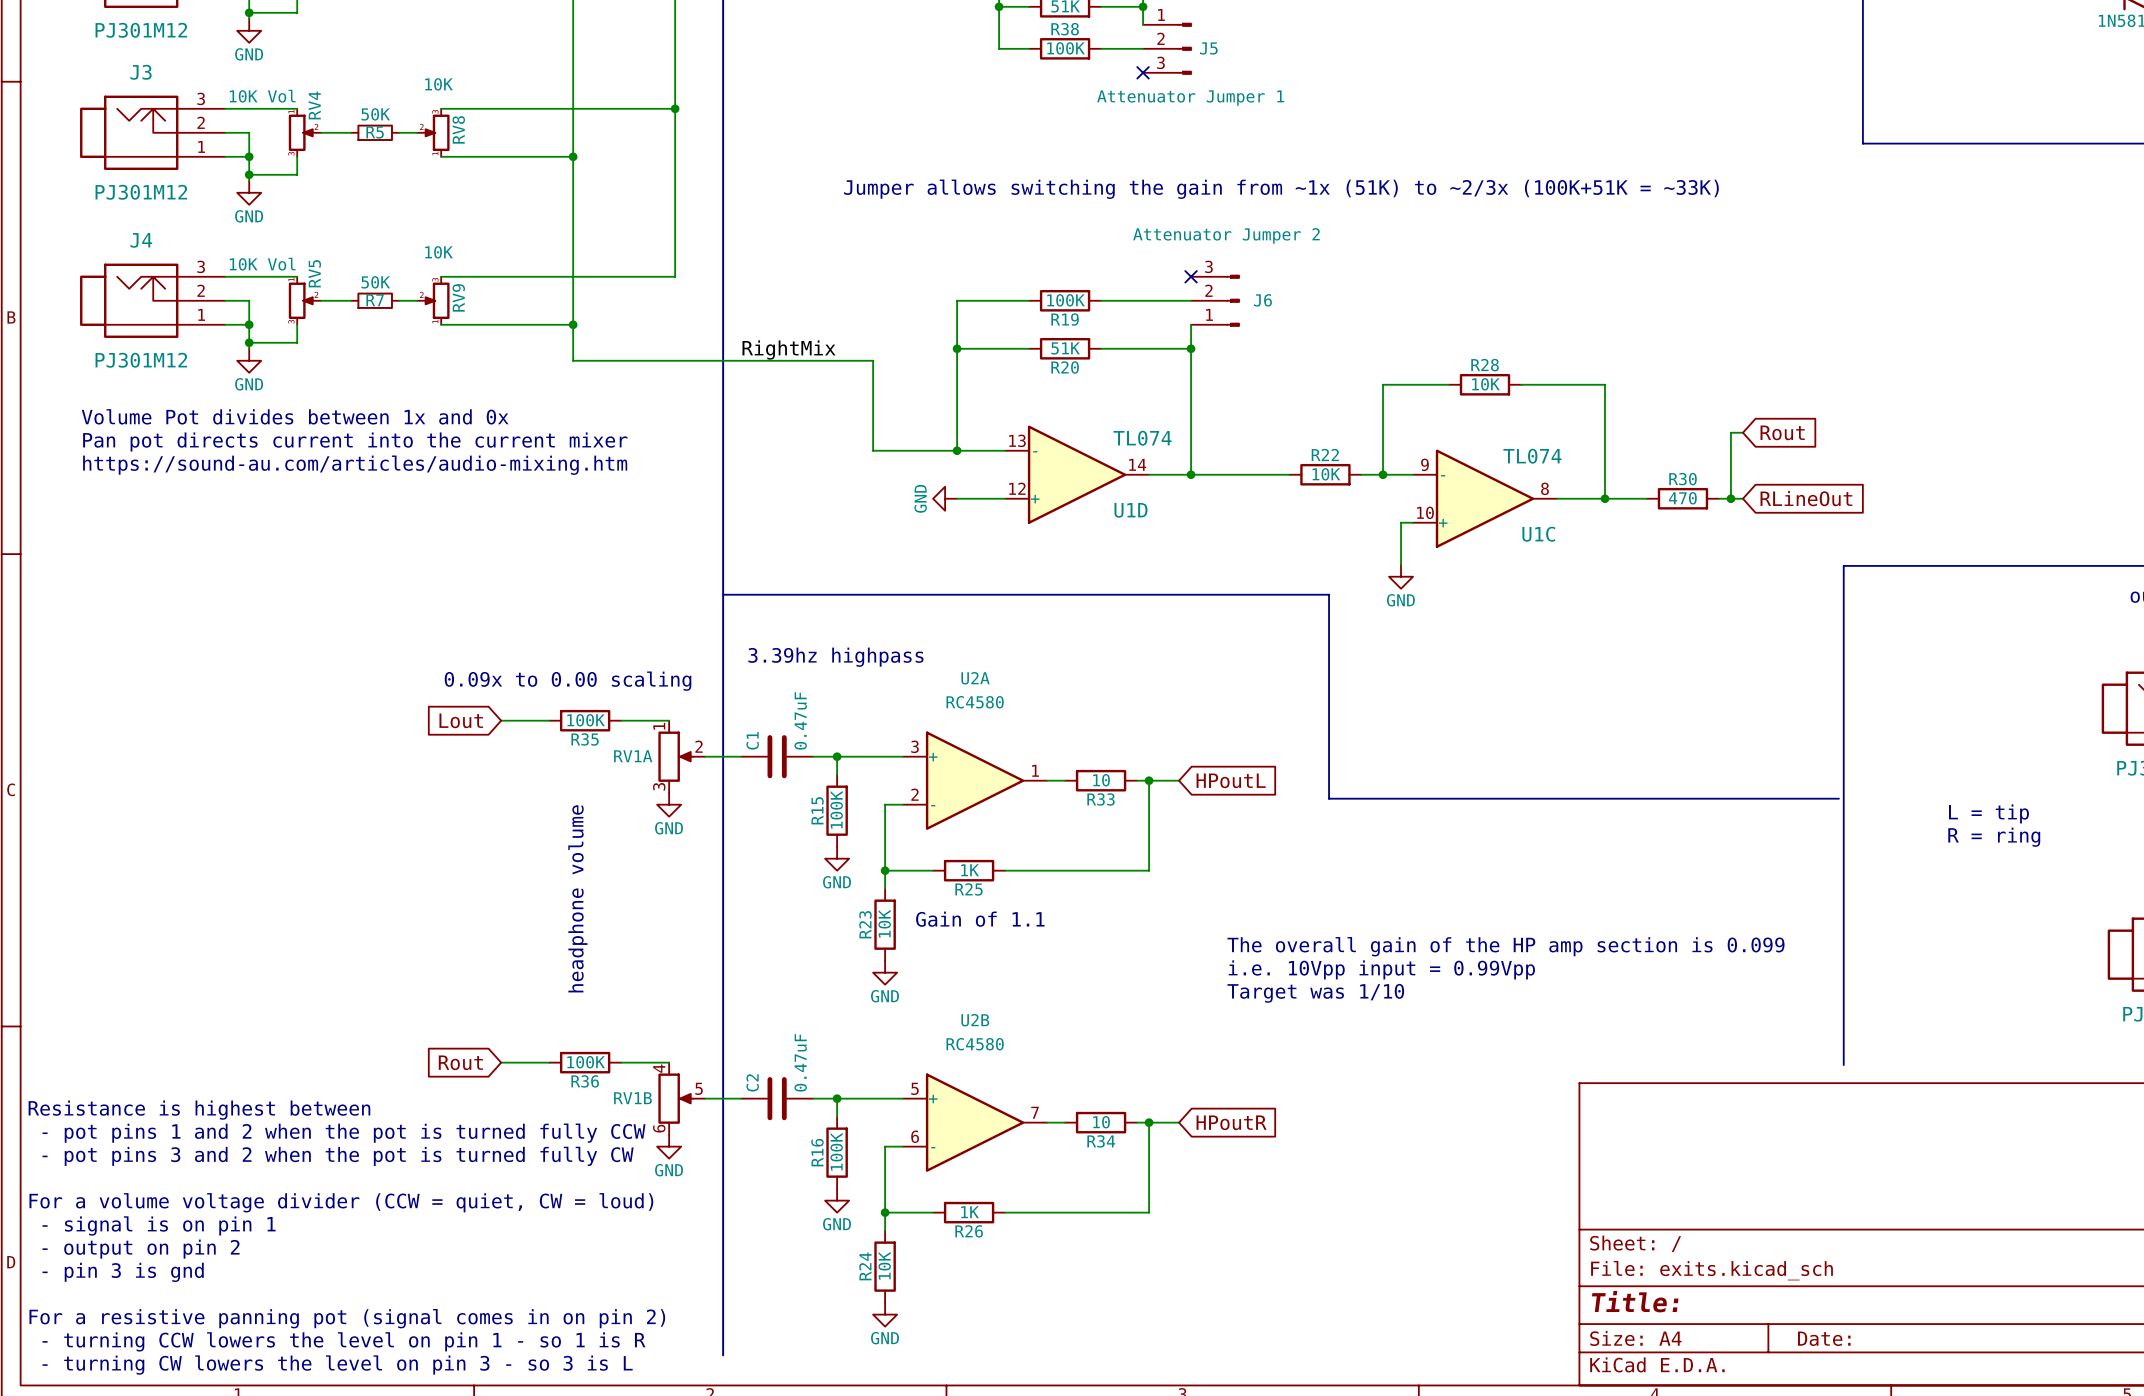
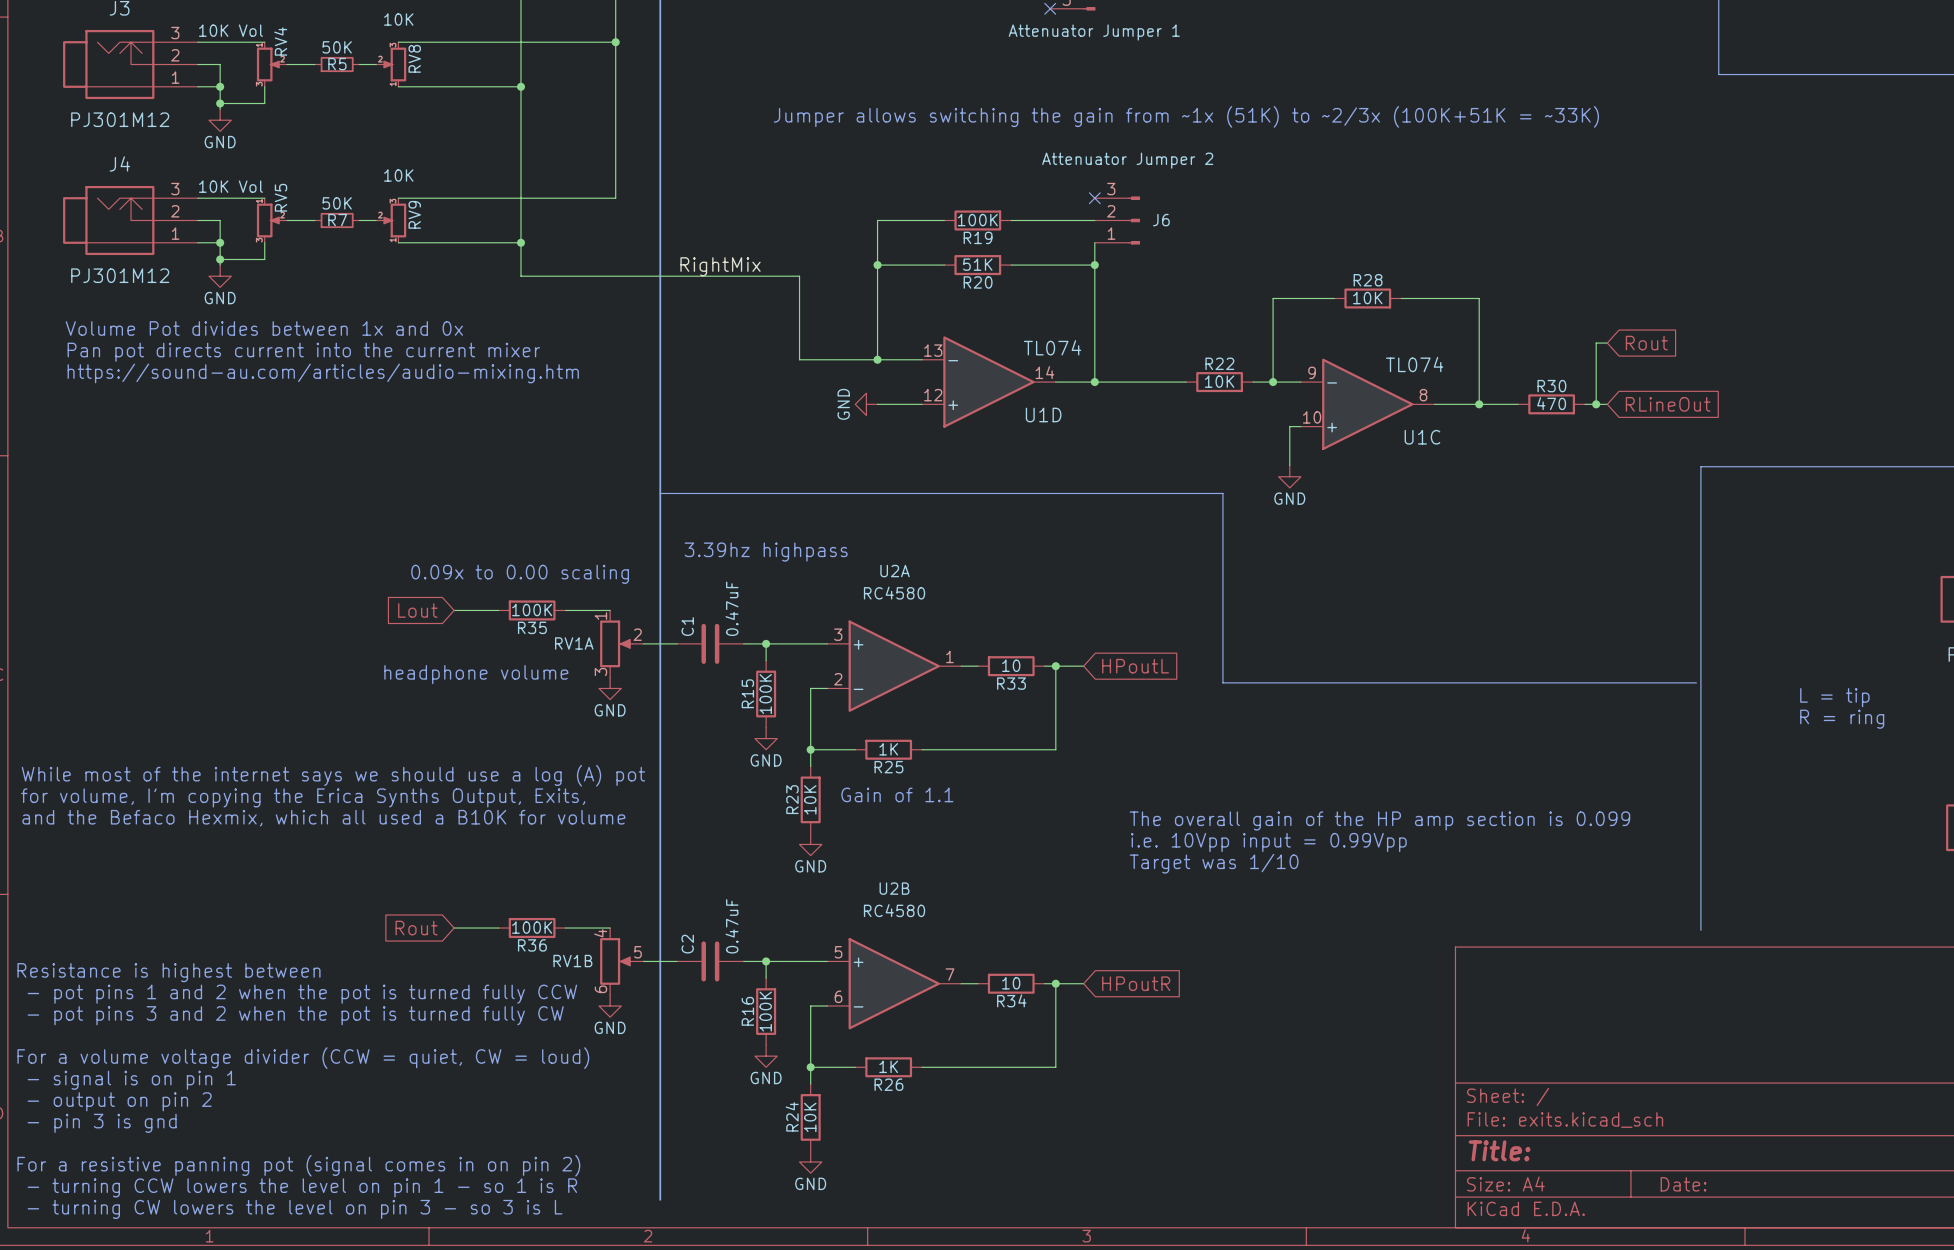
text: none -> While most of the internet says we should use a log (A) pot (333, 775)
text rotation: 0° (577, 898) -> 90° clockwise (476, 674)
text: none -> for volume, I'm copying the Erica Synths Output, Exits, (303, 797)
text: none -> and the Befaco Hexmix, which all used a B10K for volume (323, 818)

